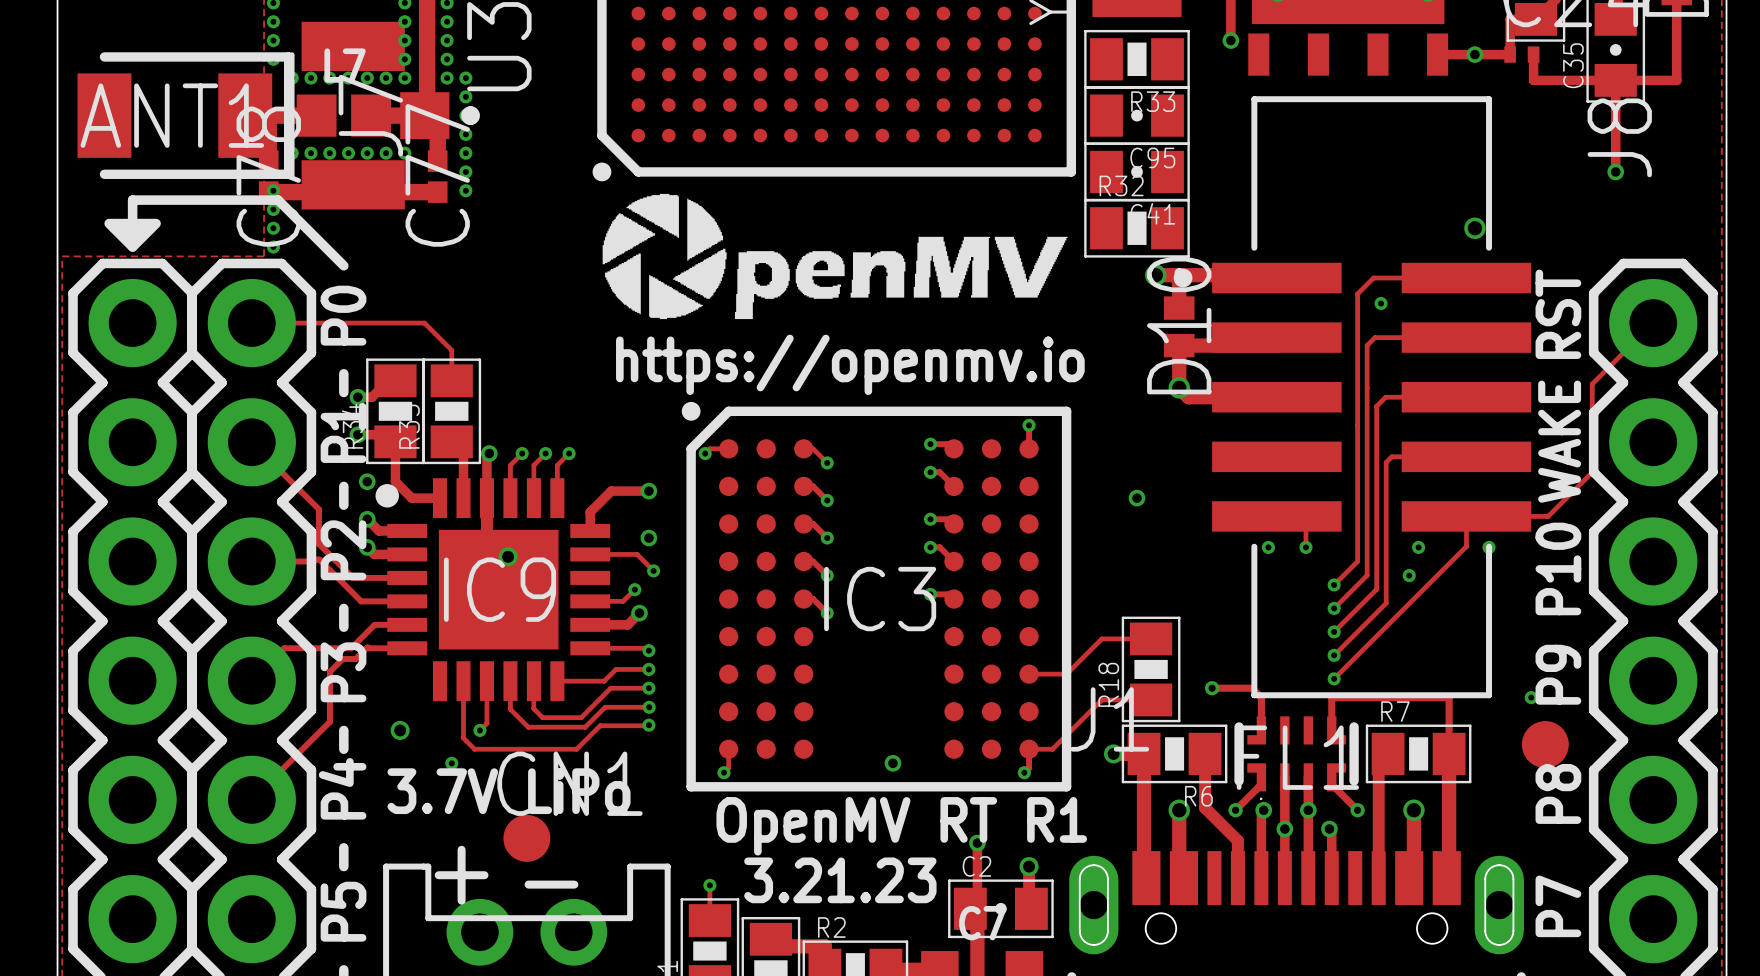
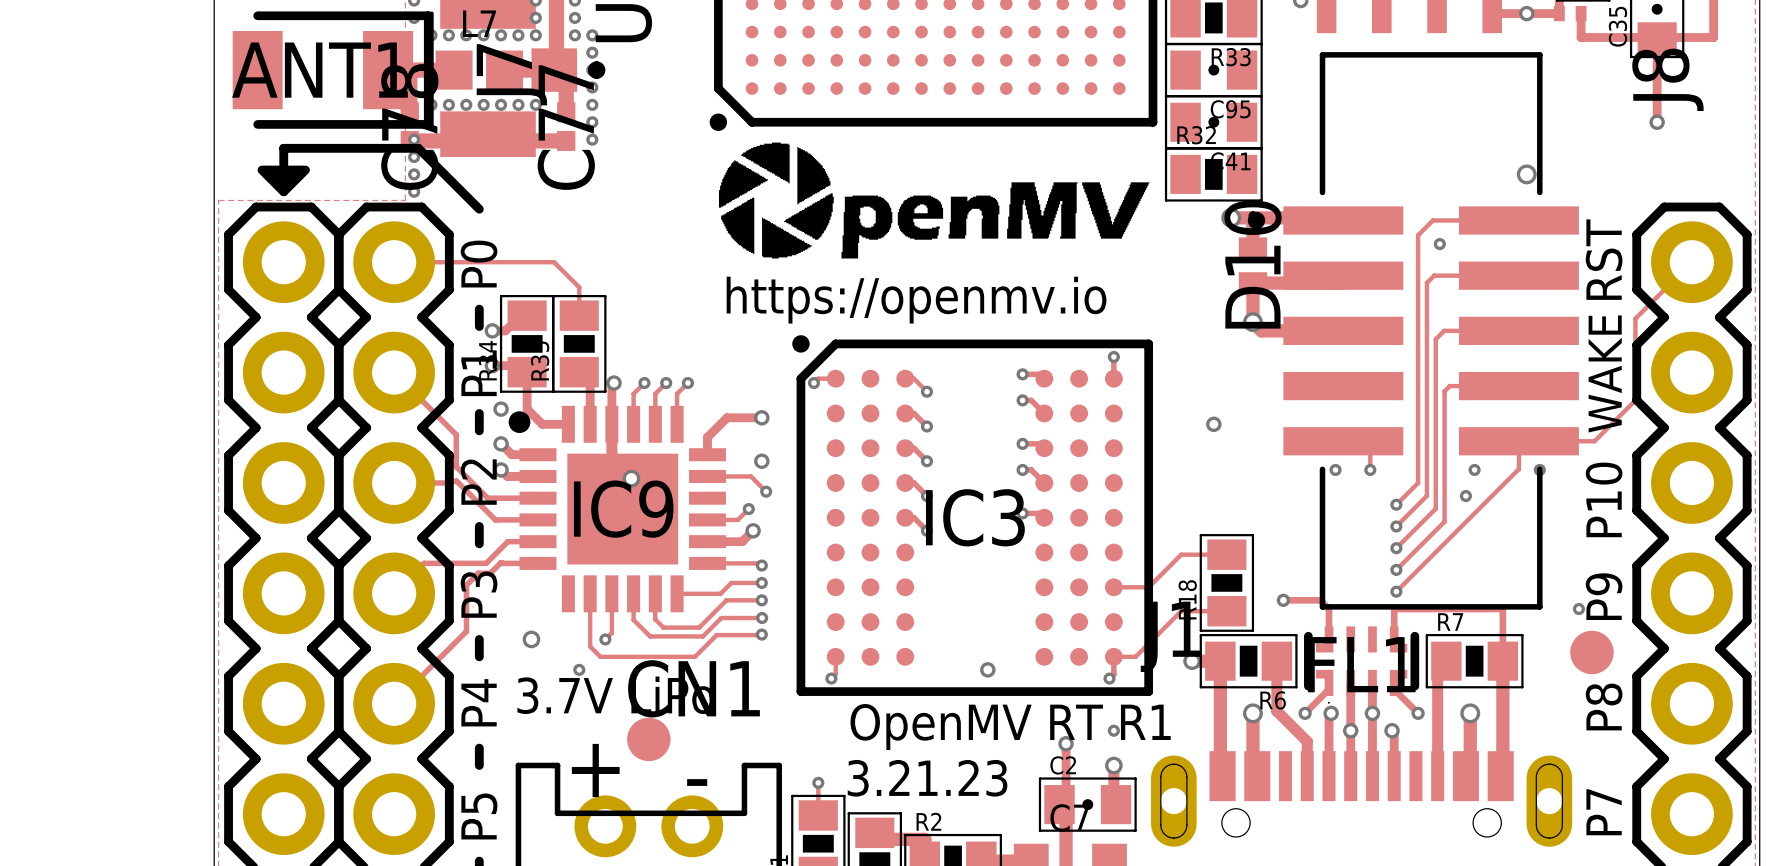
via: none -> (1113, 730)

